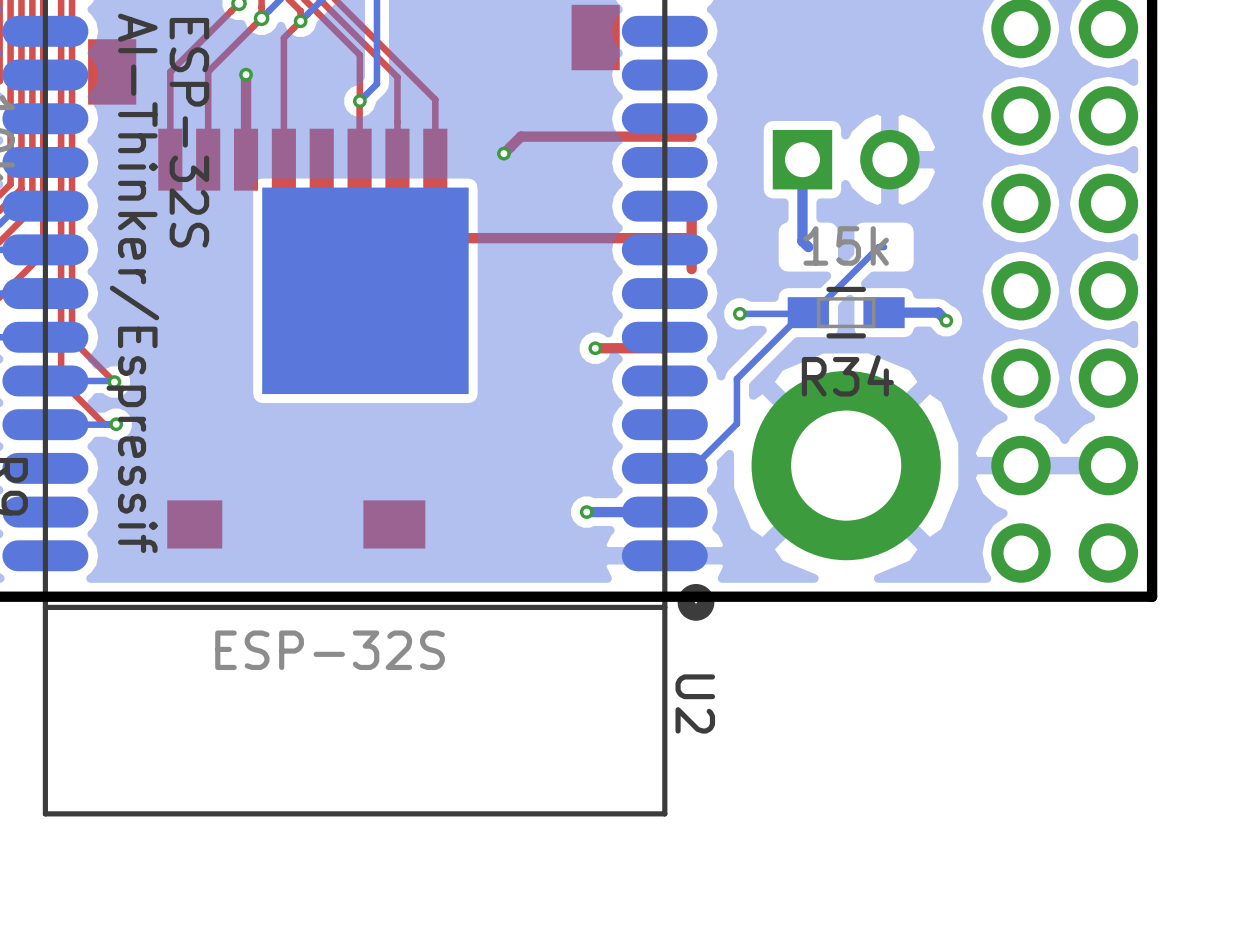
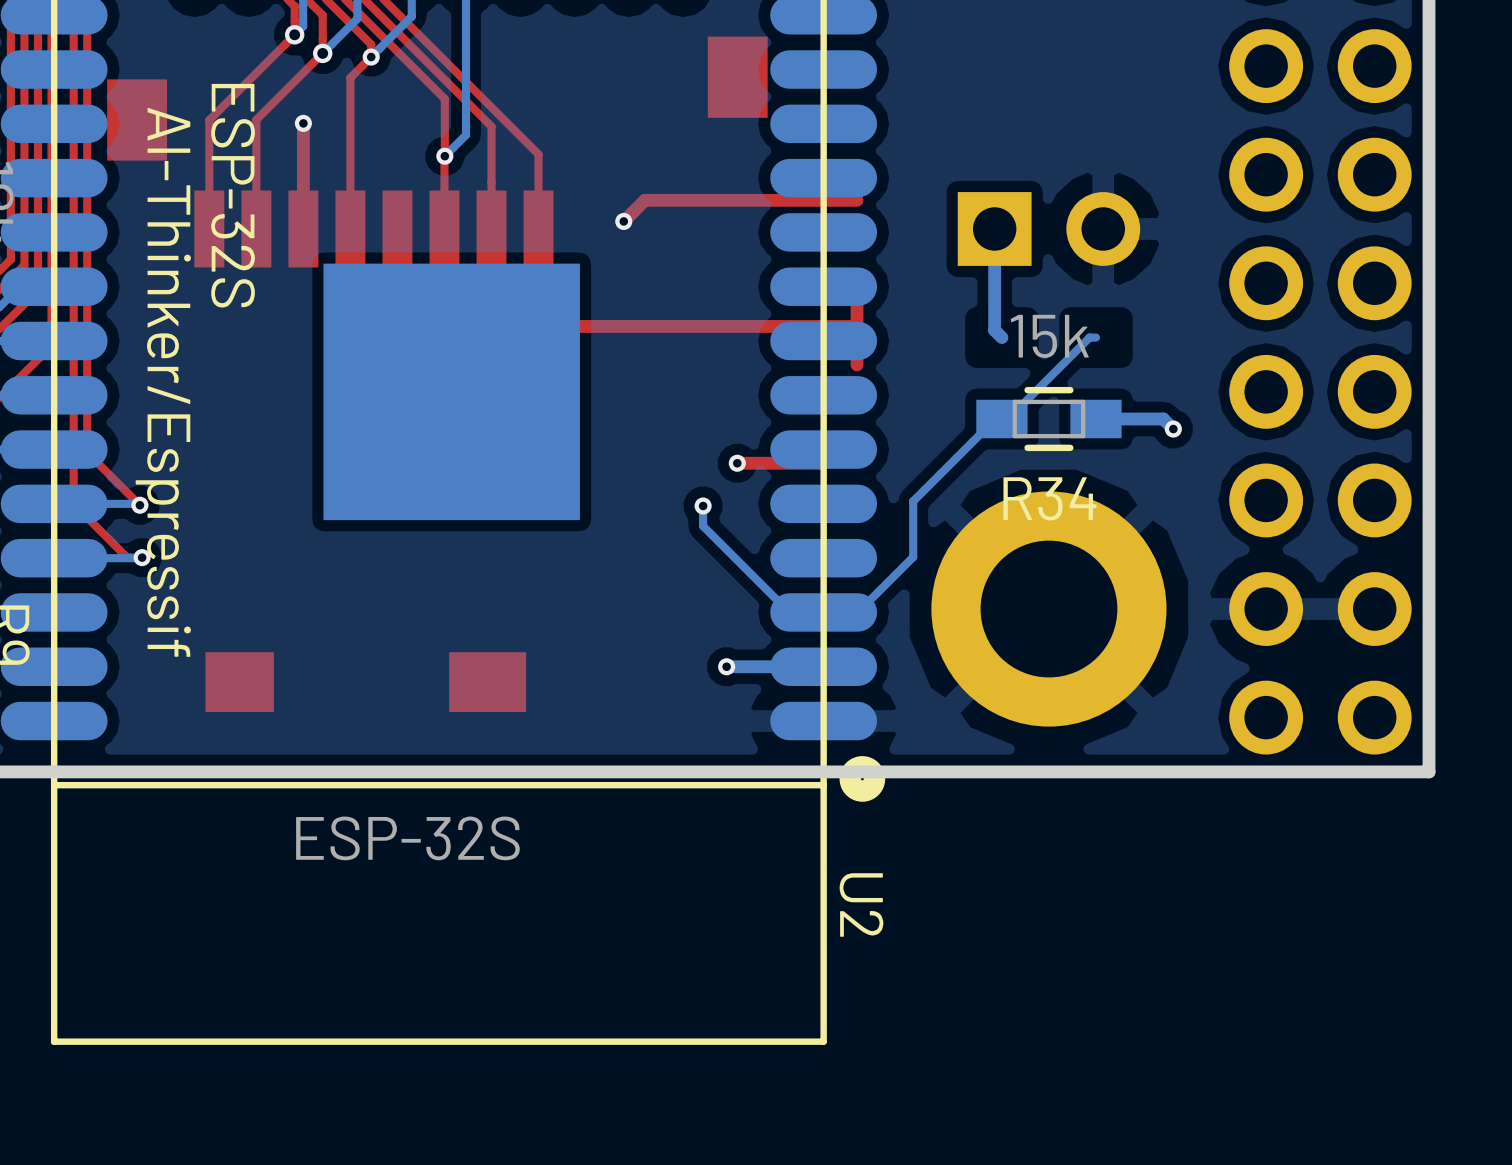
bottom track: (808, 312) (739, 313) -> none
via position: (739, 313) -> (703, 506)
bottom track: none -> (703, 506) (703, 526) (789, 612)

